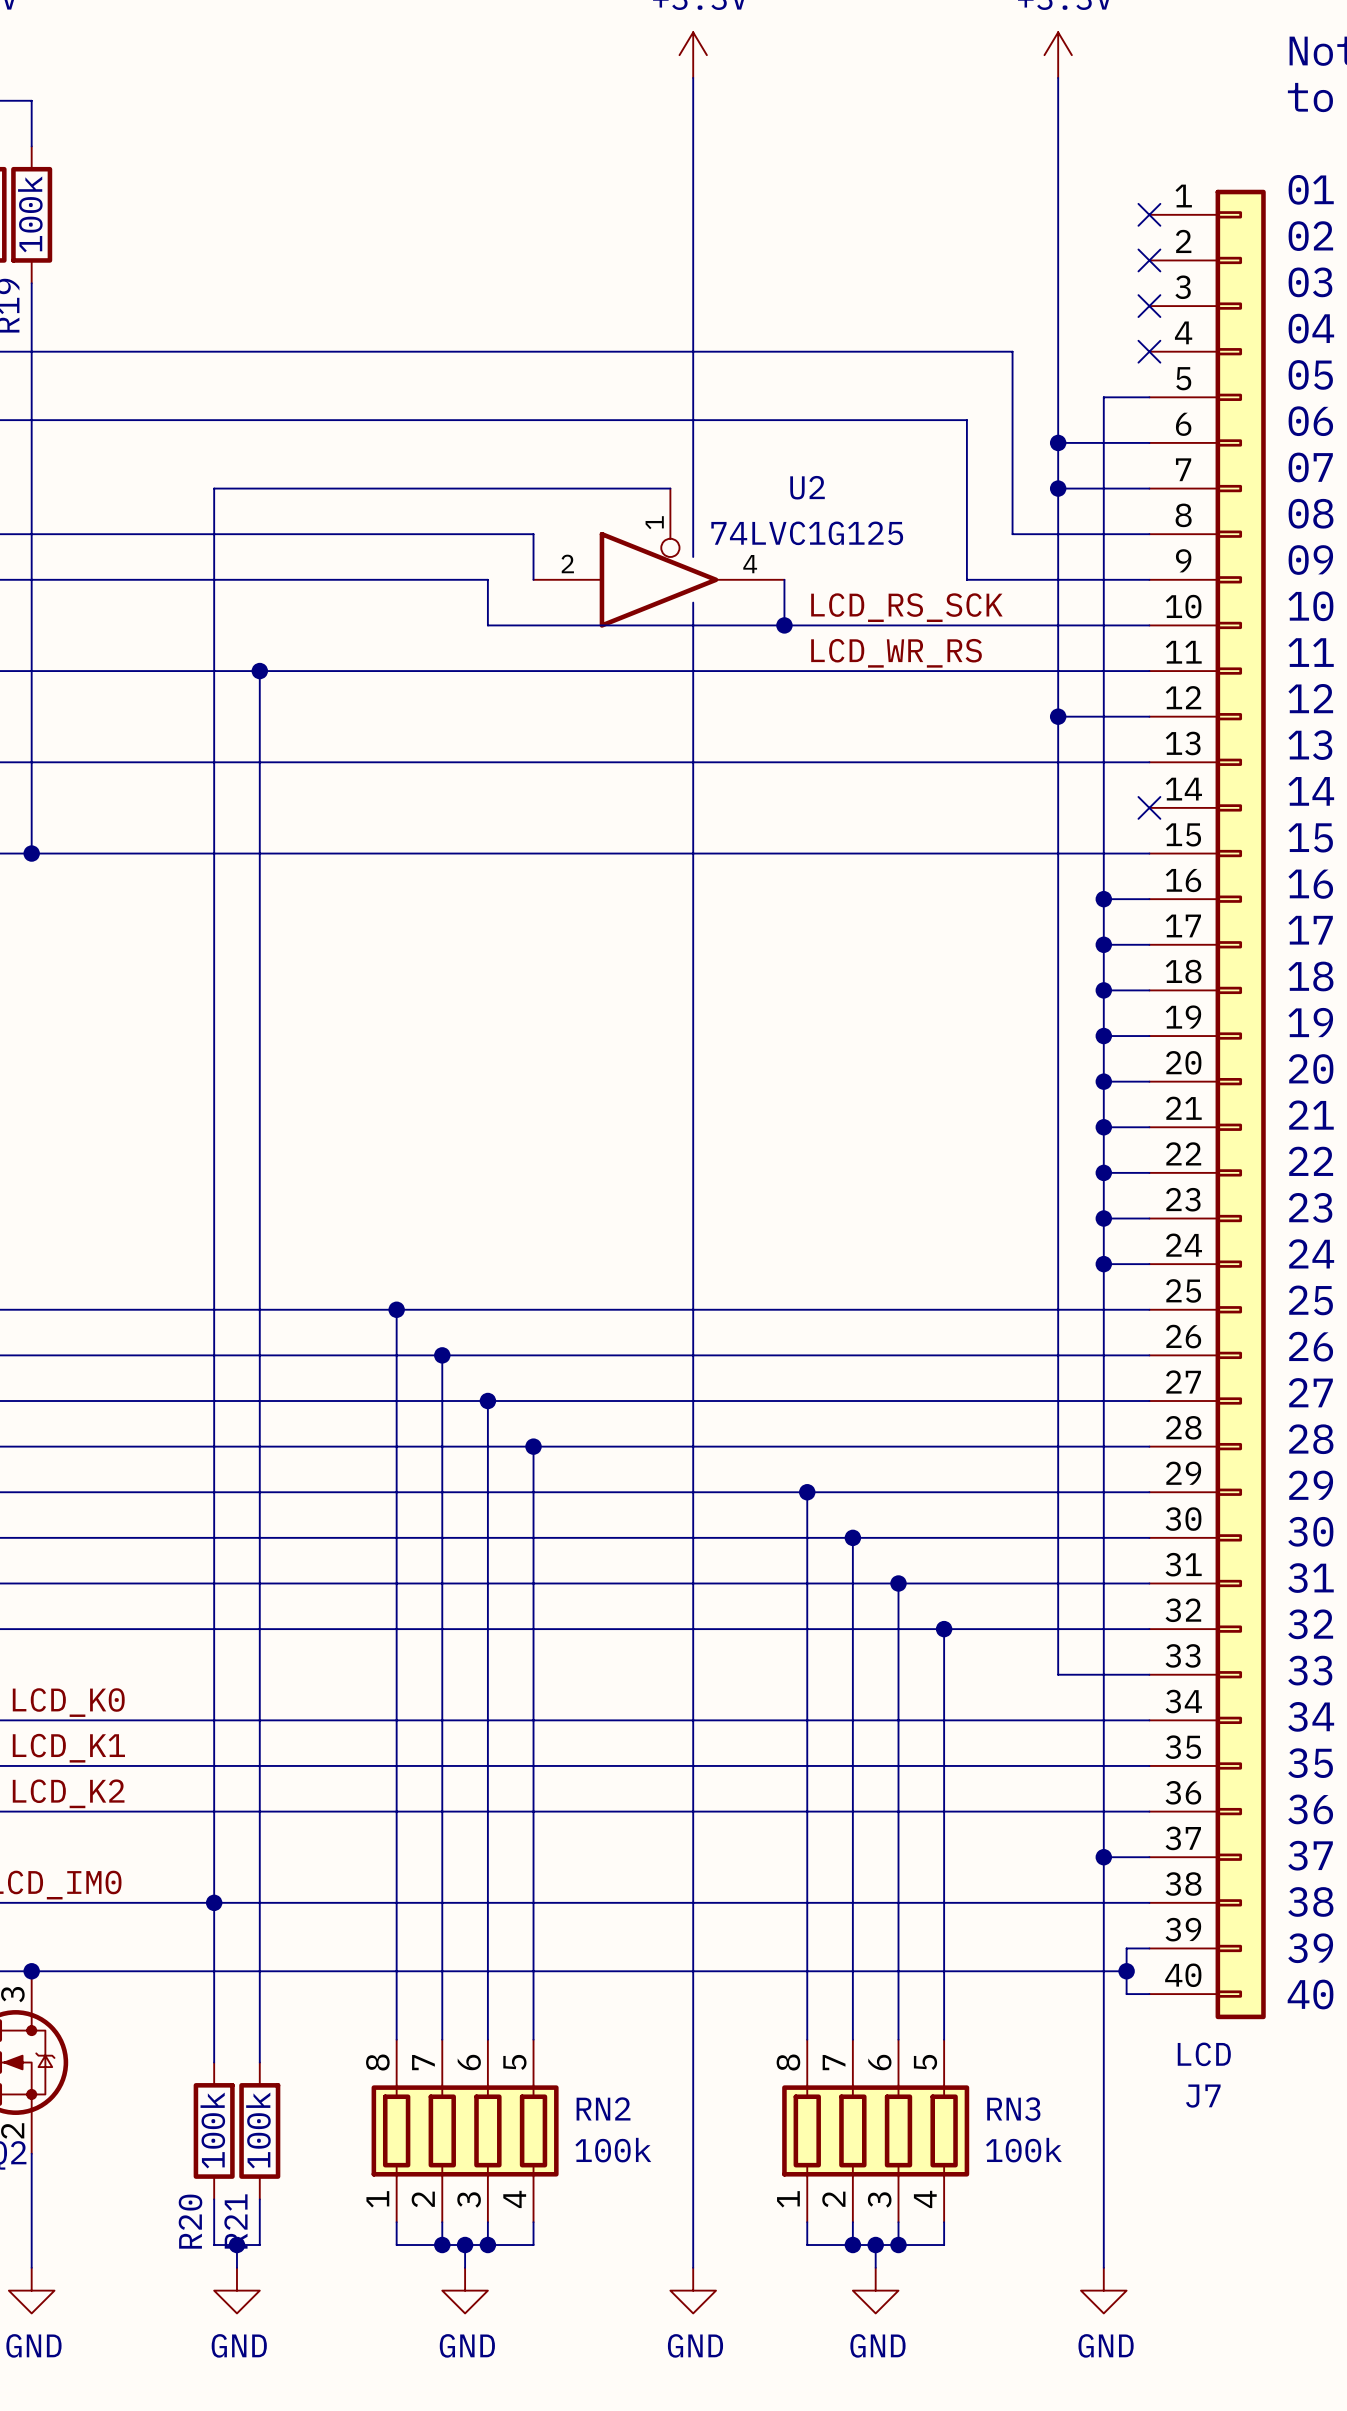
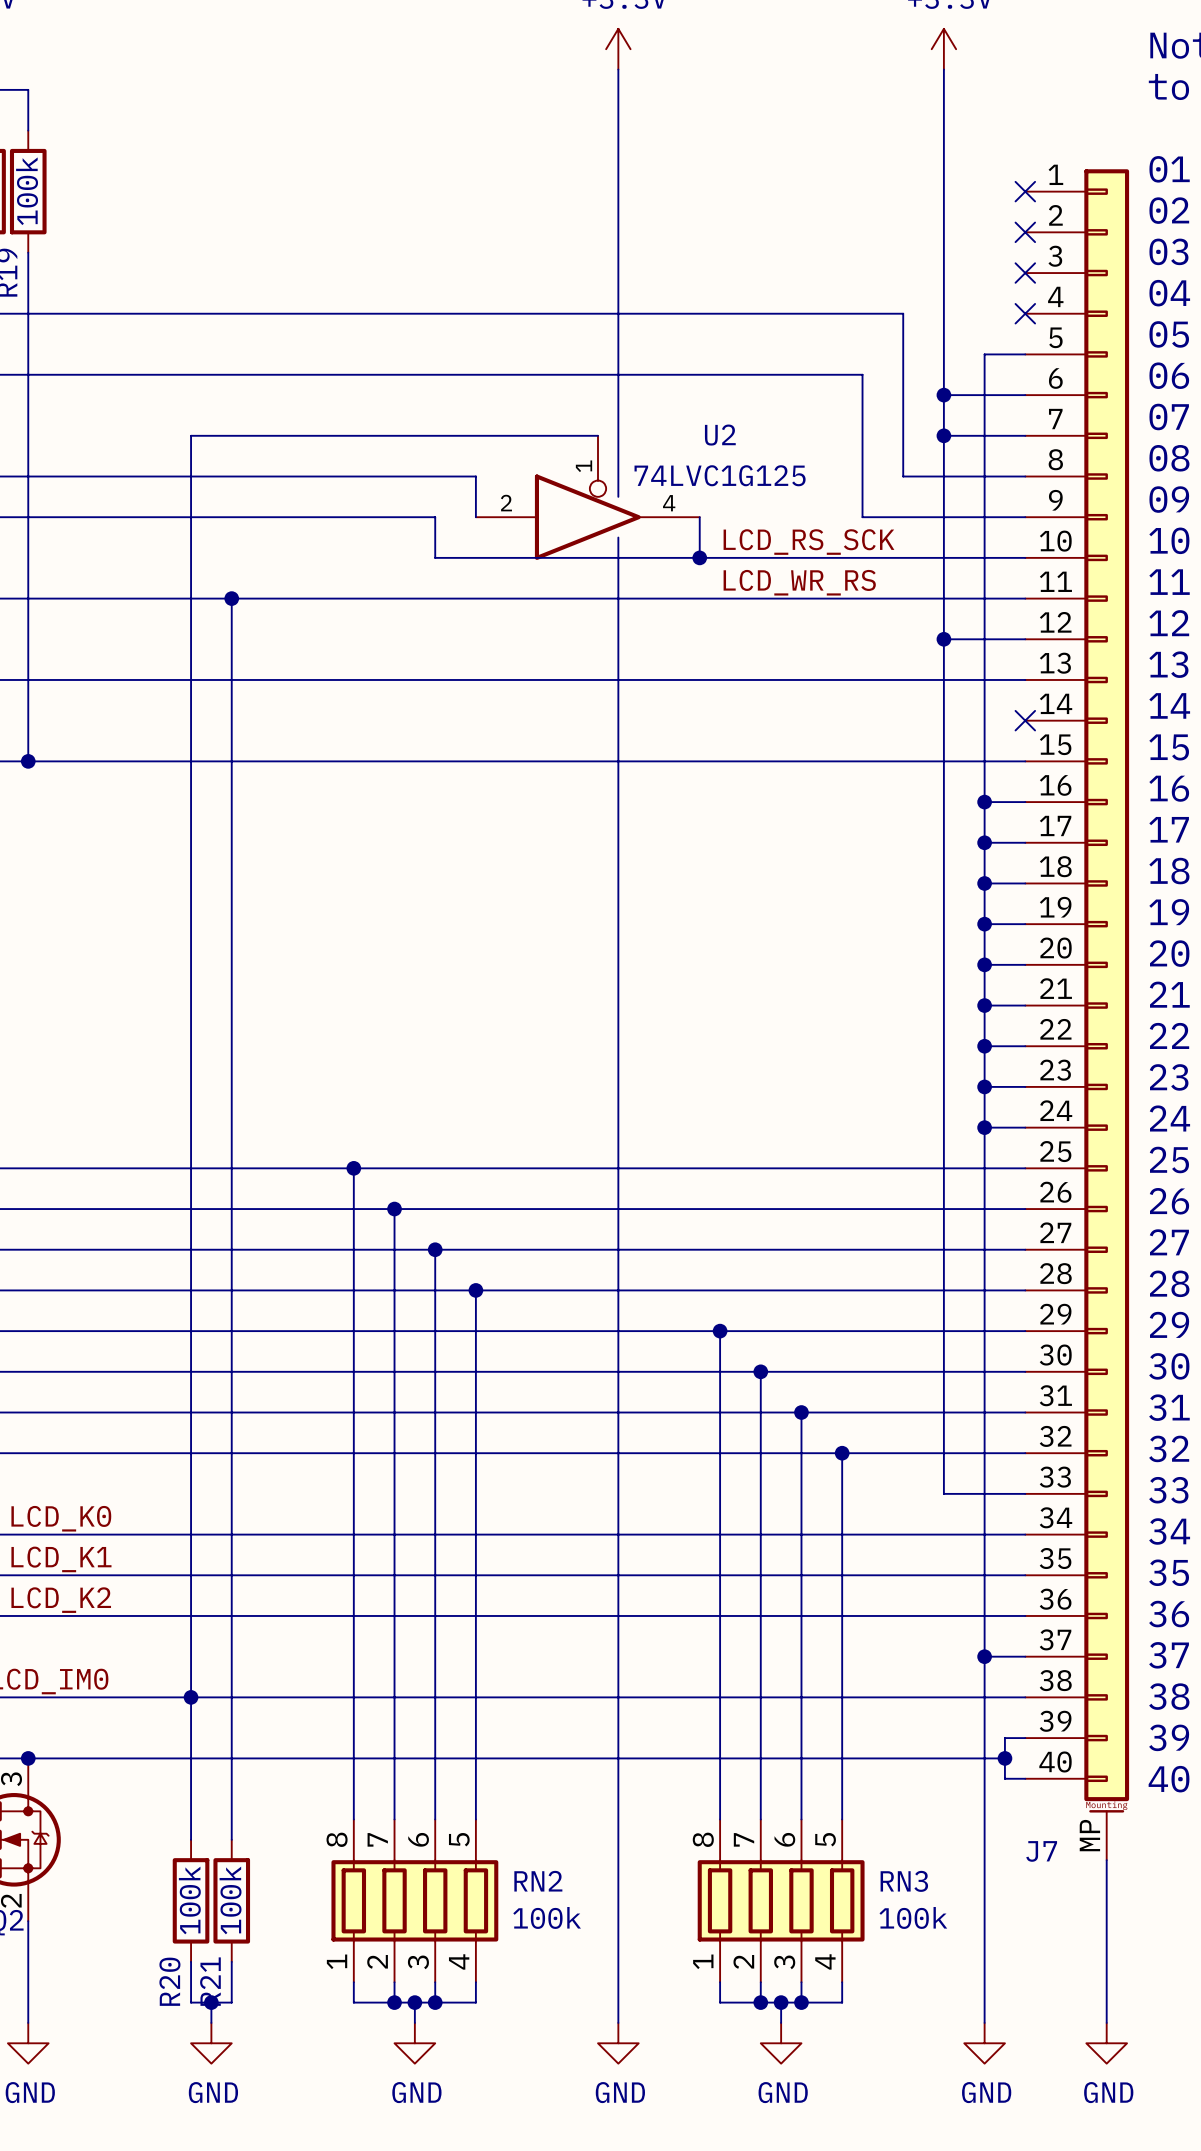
J7 symbol: [1149, 189, 1266, 2020] -> [1025, 169, 1130, 1861]
J7 value: LCD (1204, 2054) -> none
wire: none -> (1106, 1860) (1106, 2022)
J7 name position: J7 (1203, 2096) -> J7 (1041, 1851)
power symbol: none -> GND (1106, 2043)

